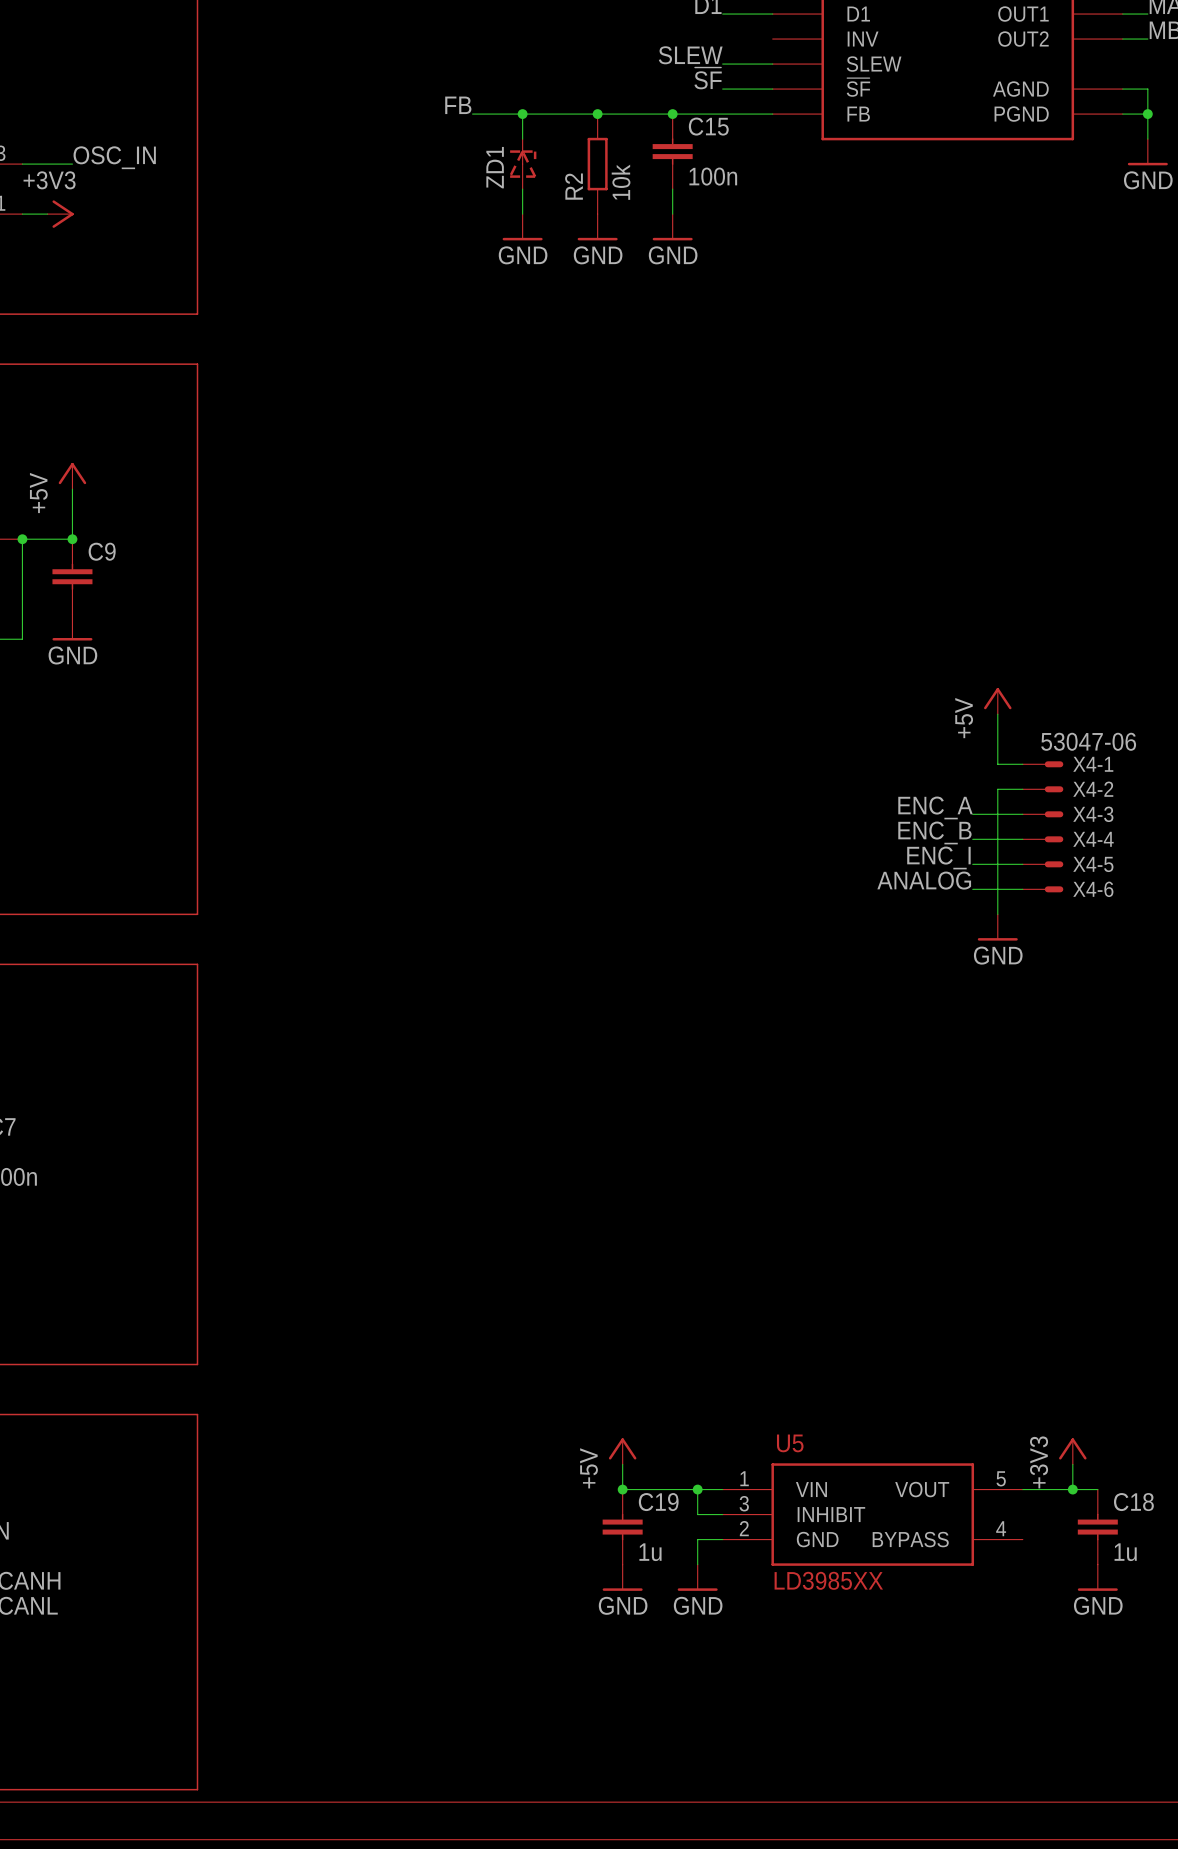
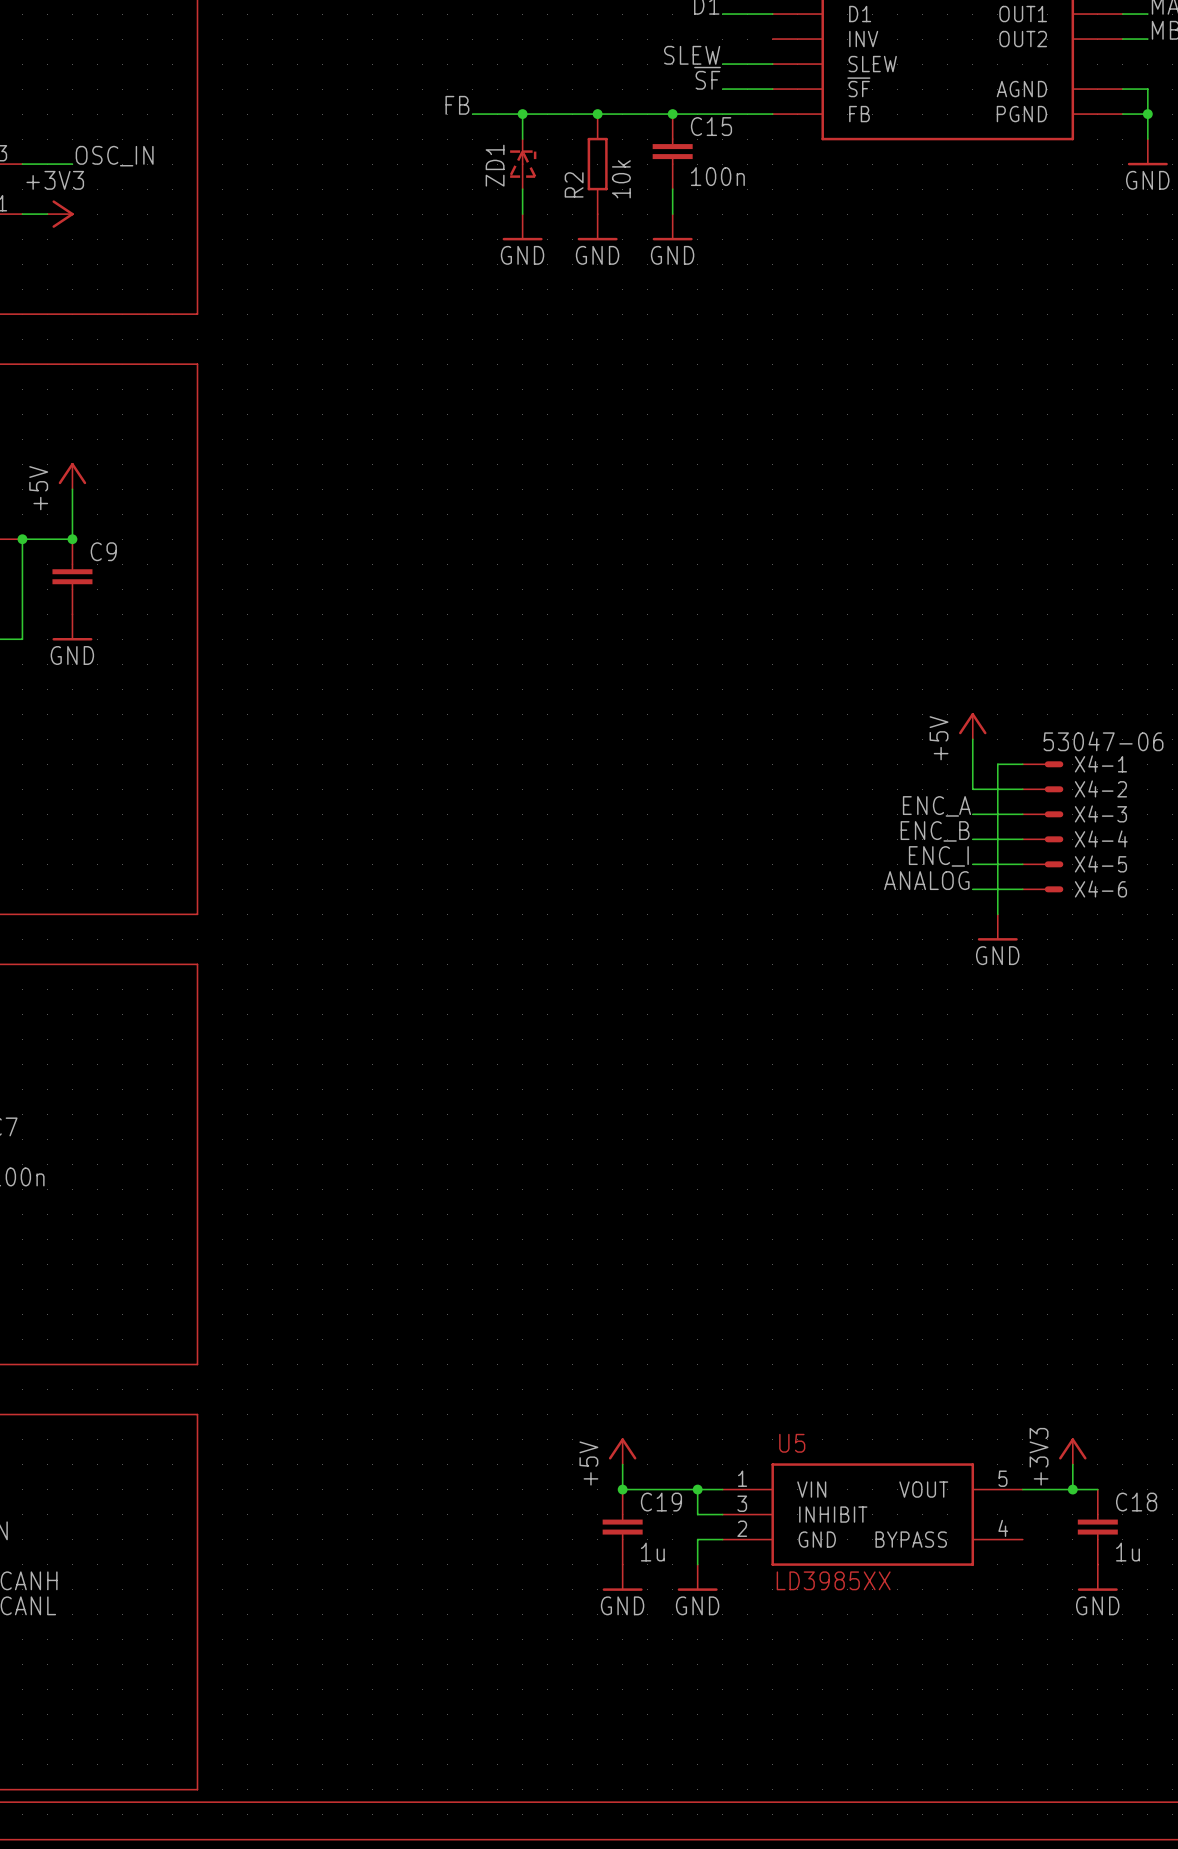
power symbol position: +5V (997, 701) -> +5V (972, 726)
wire: (997, 714) (997, 764) -> (972, 739) (972, 789) (997, 789) (997, 764)

